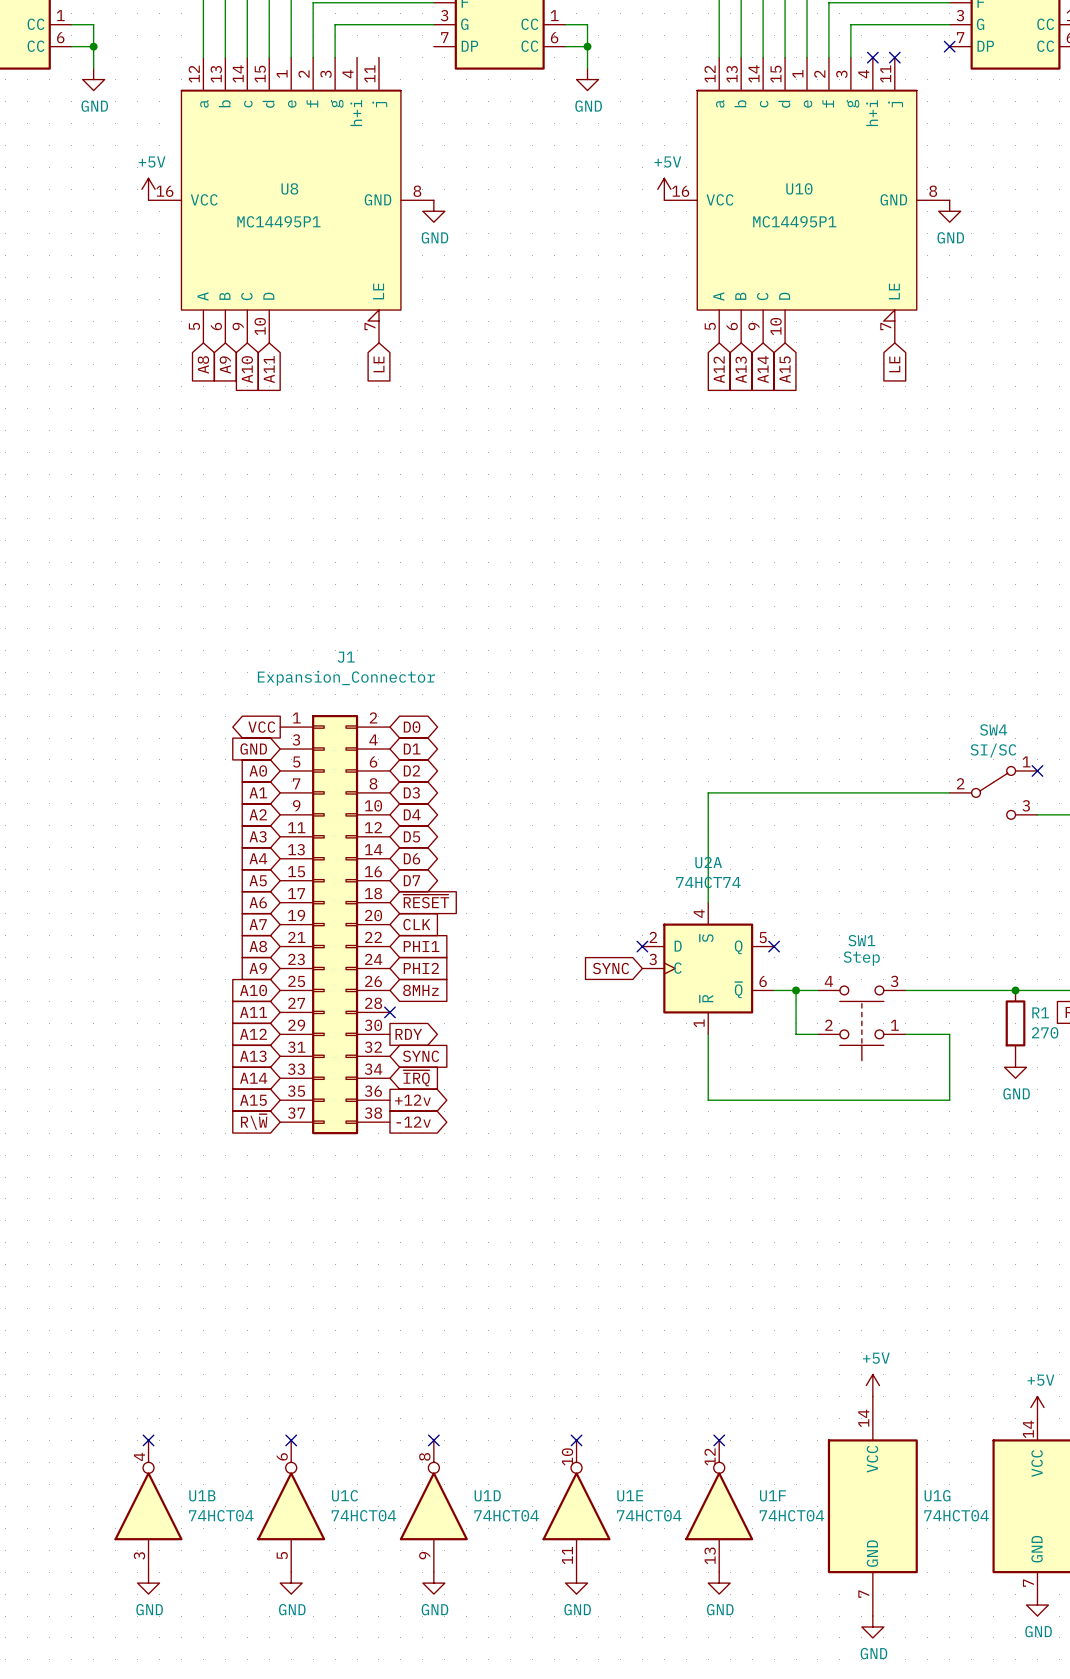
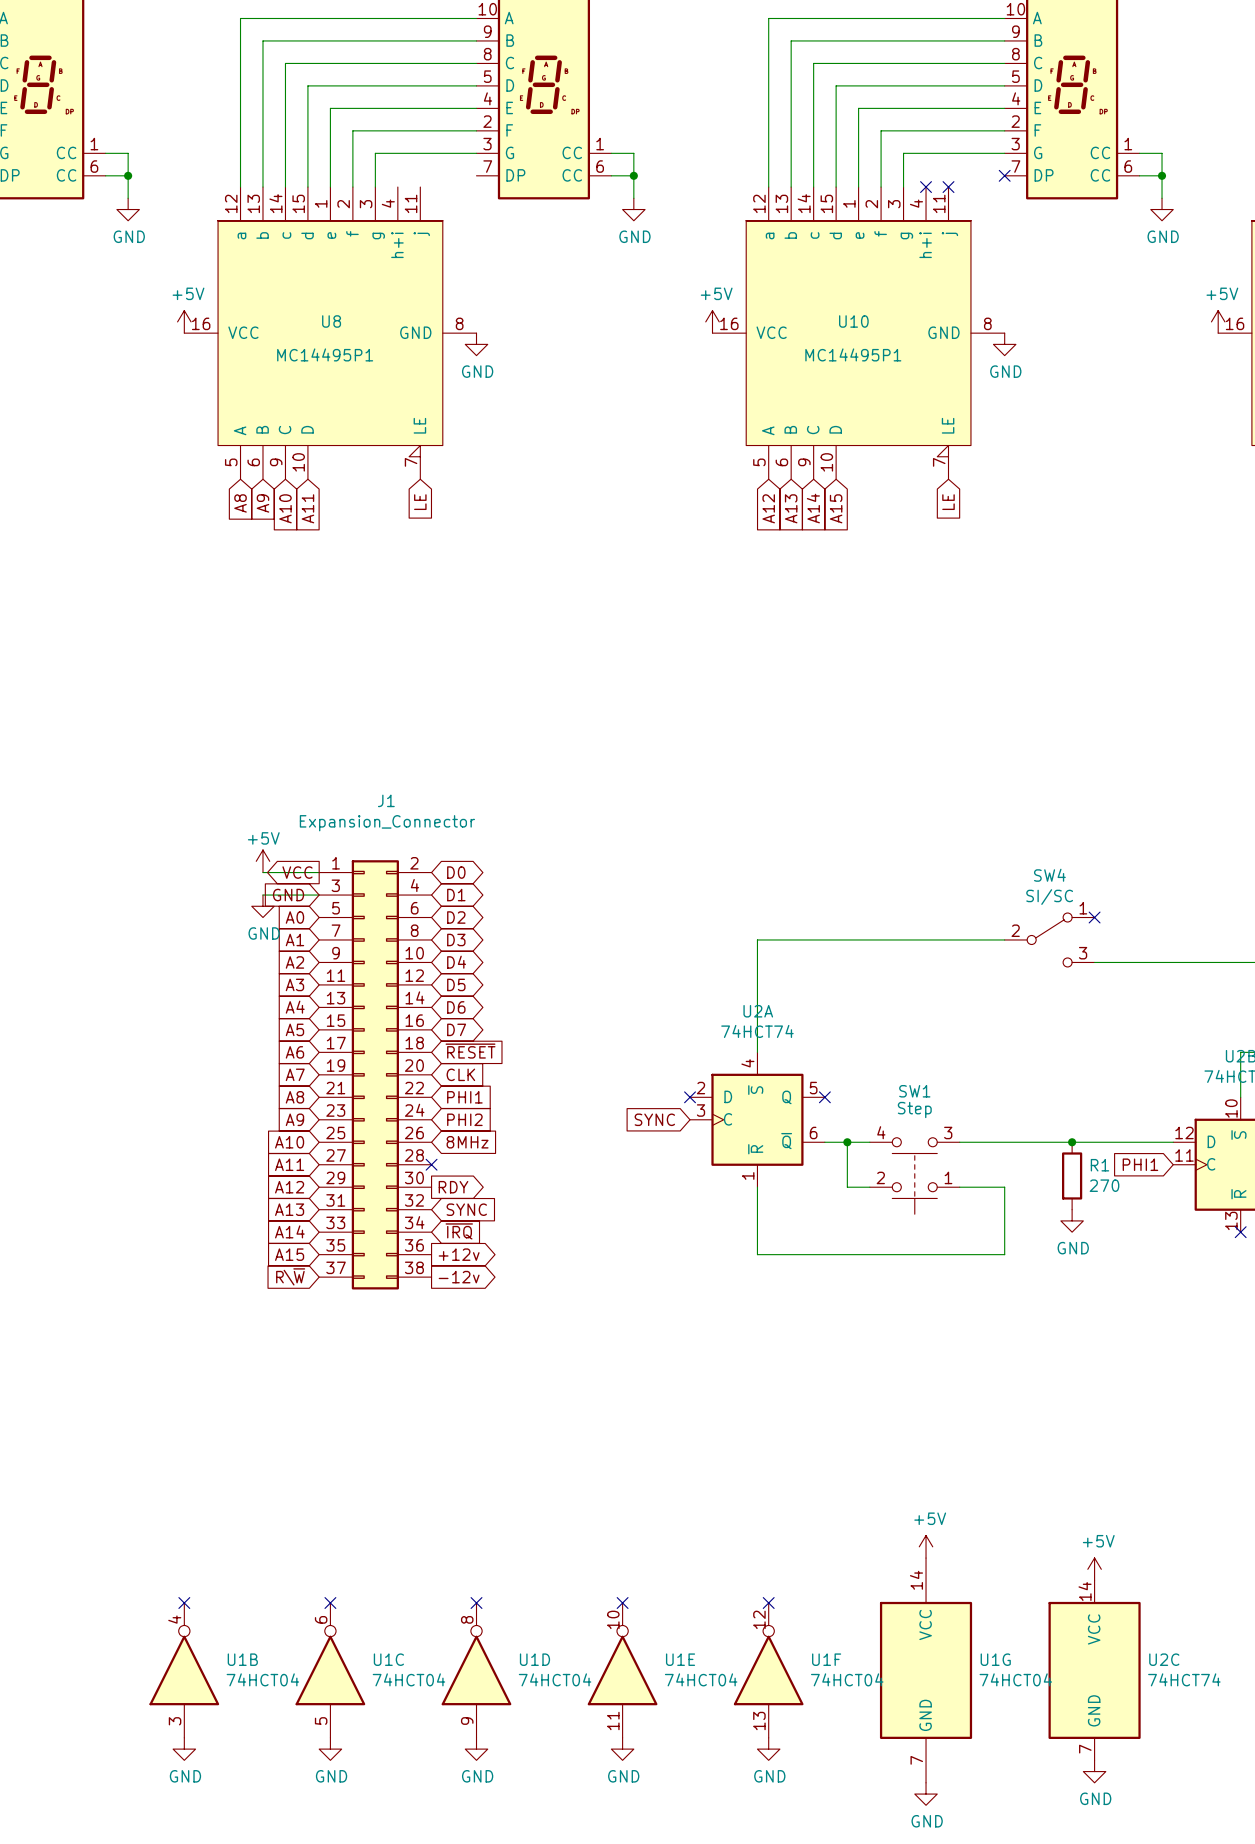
power symbol: none -> +5V (262, 861)
wire: none -> (262, 872) (319, 872)
wire: none -> (262, 895) (319, 895)
power symbol: none -> GND (262, 906)

